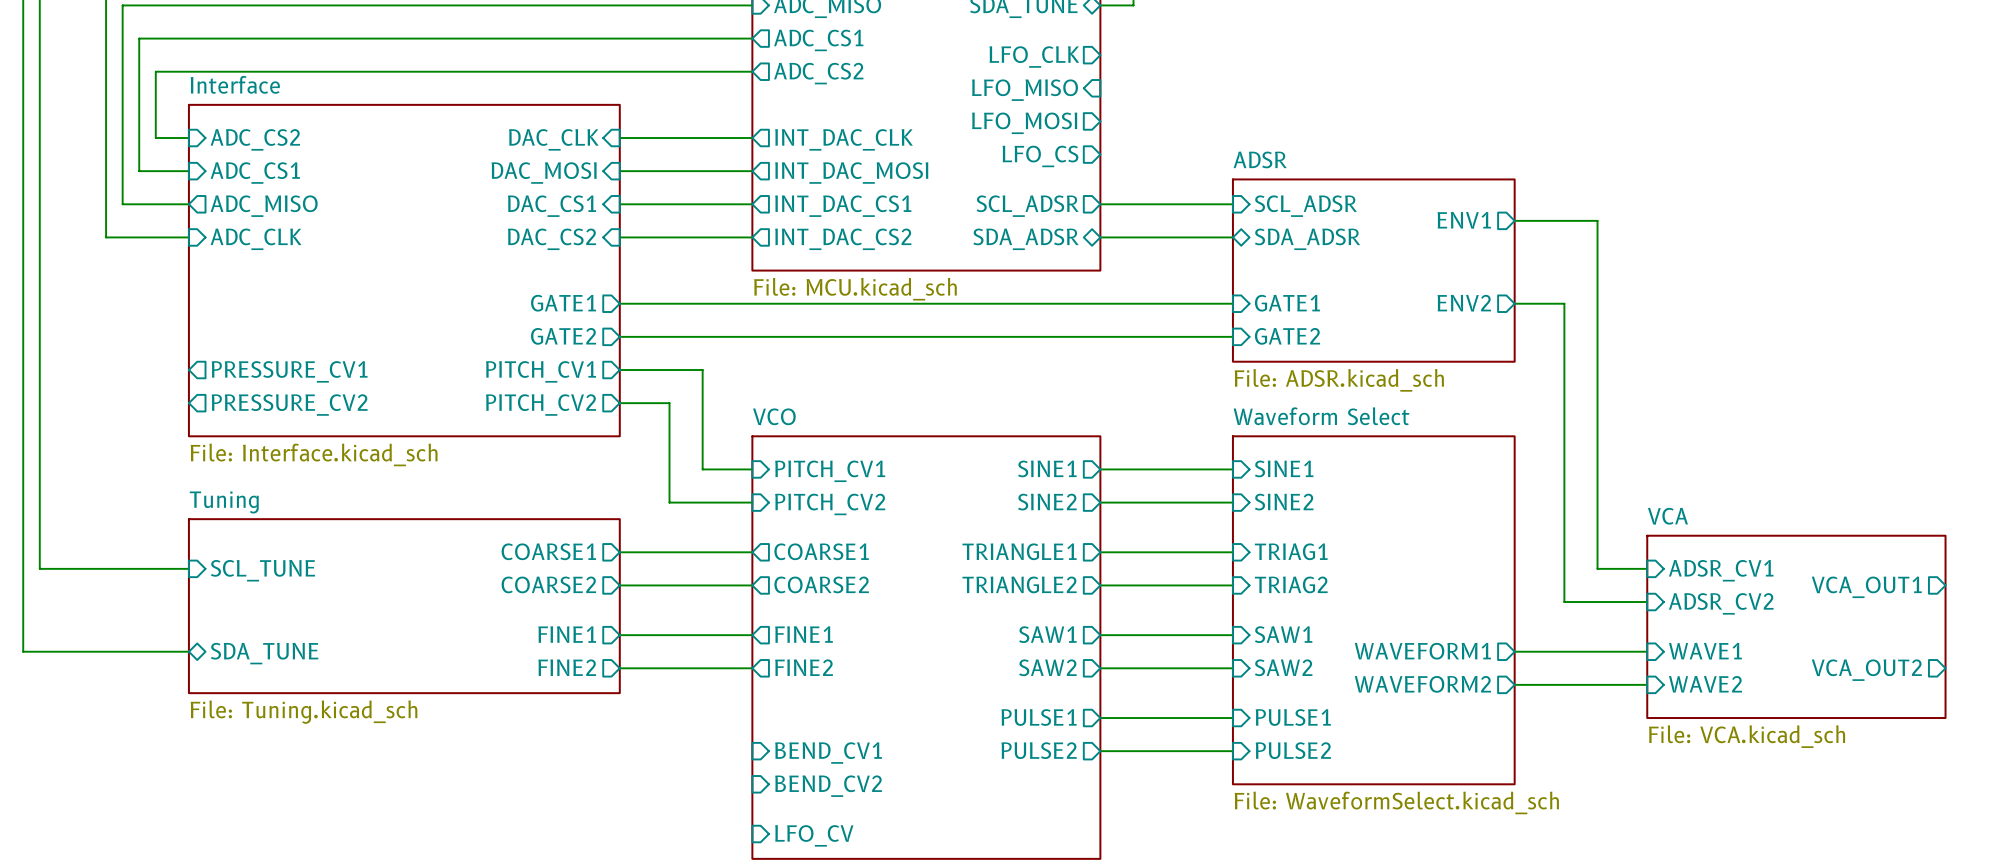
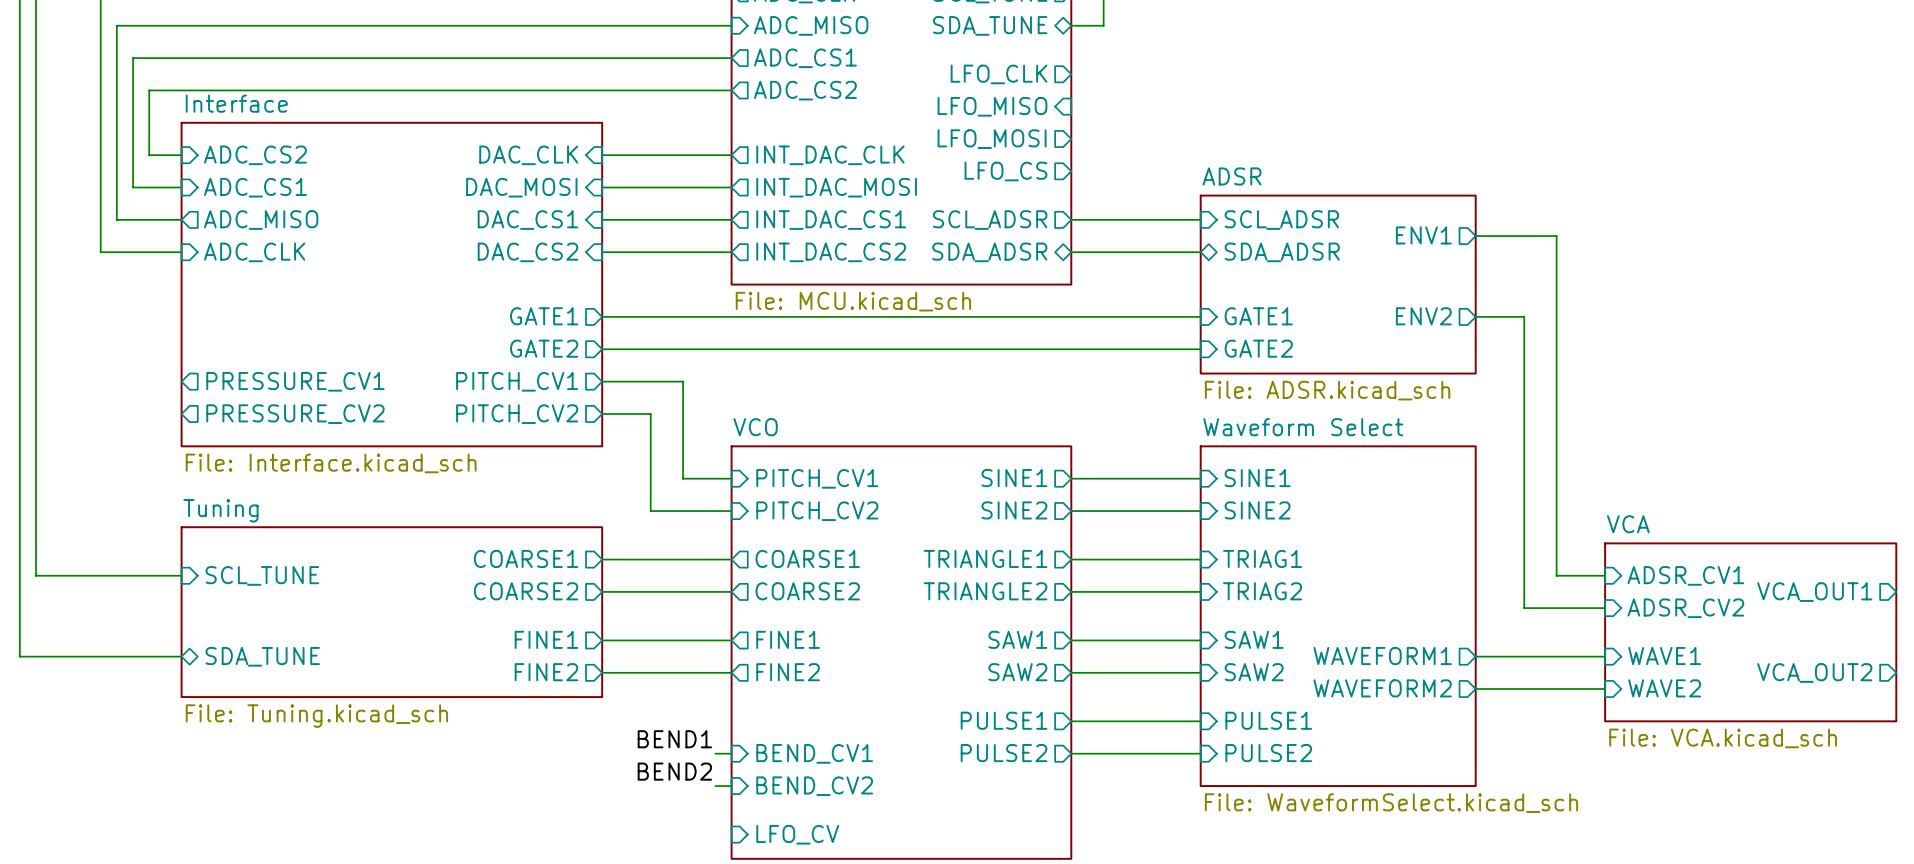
label: none -> BEND1 (674, 739)
wire: none -> (715, 753) (731, 753)
label: none -> BEND2 (674, 771)
wire: none -> (715, 786) (731, 786)

